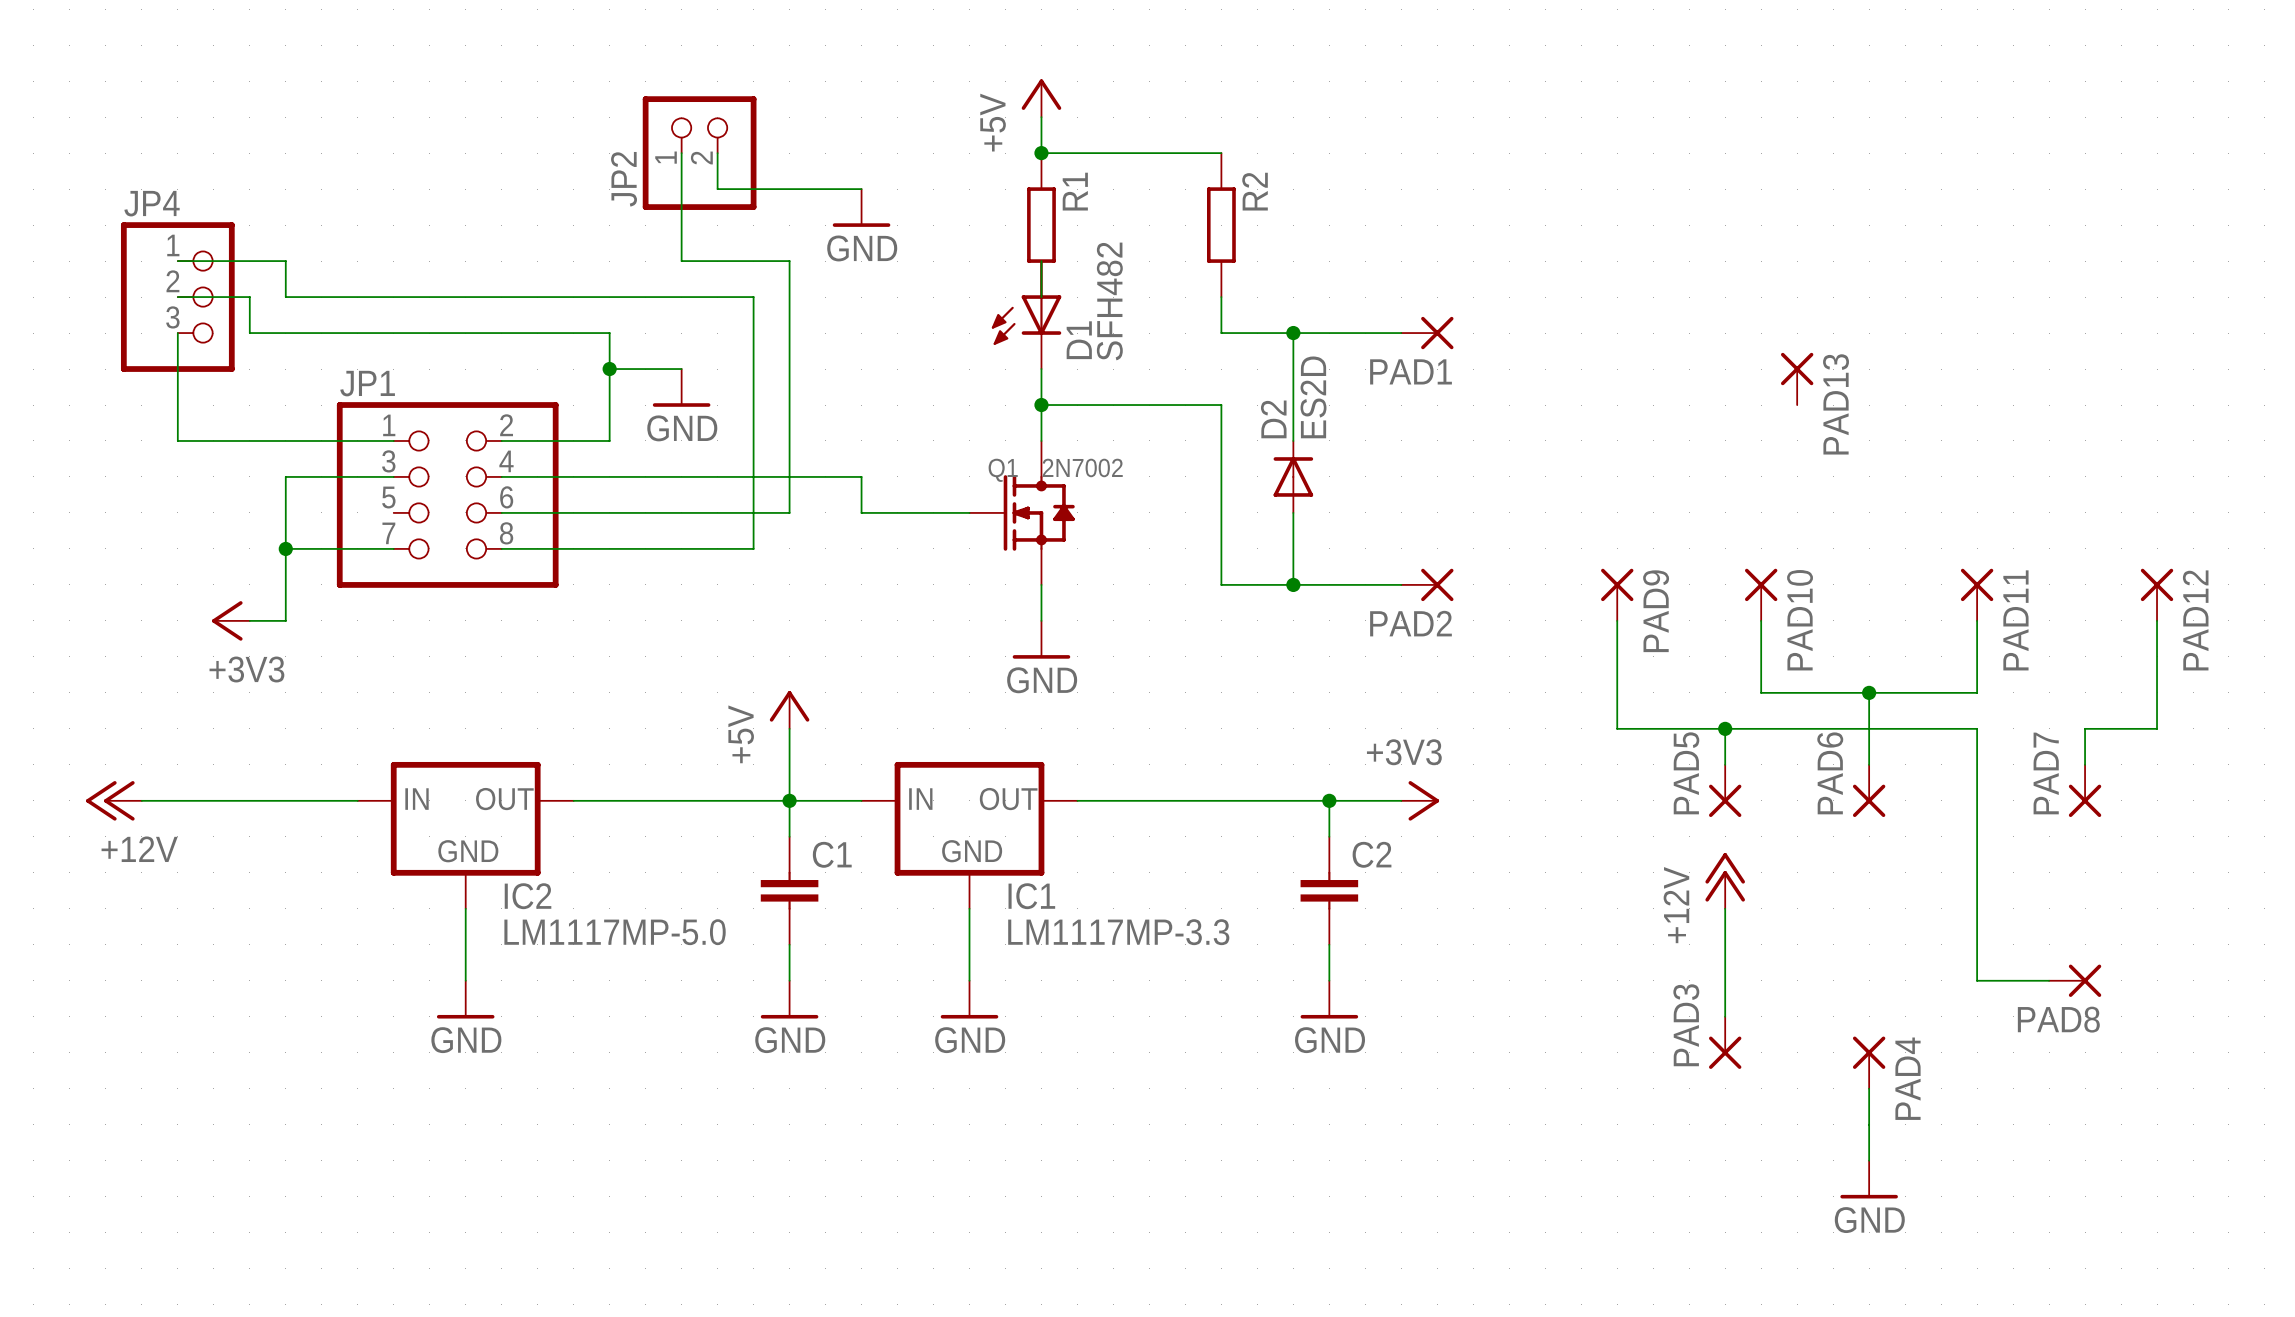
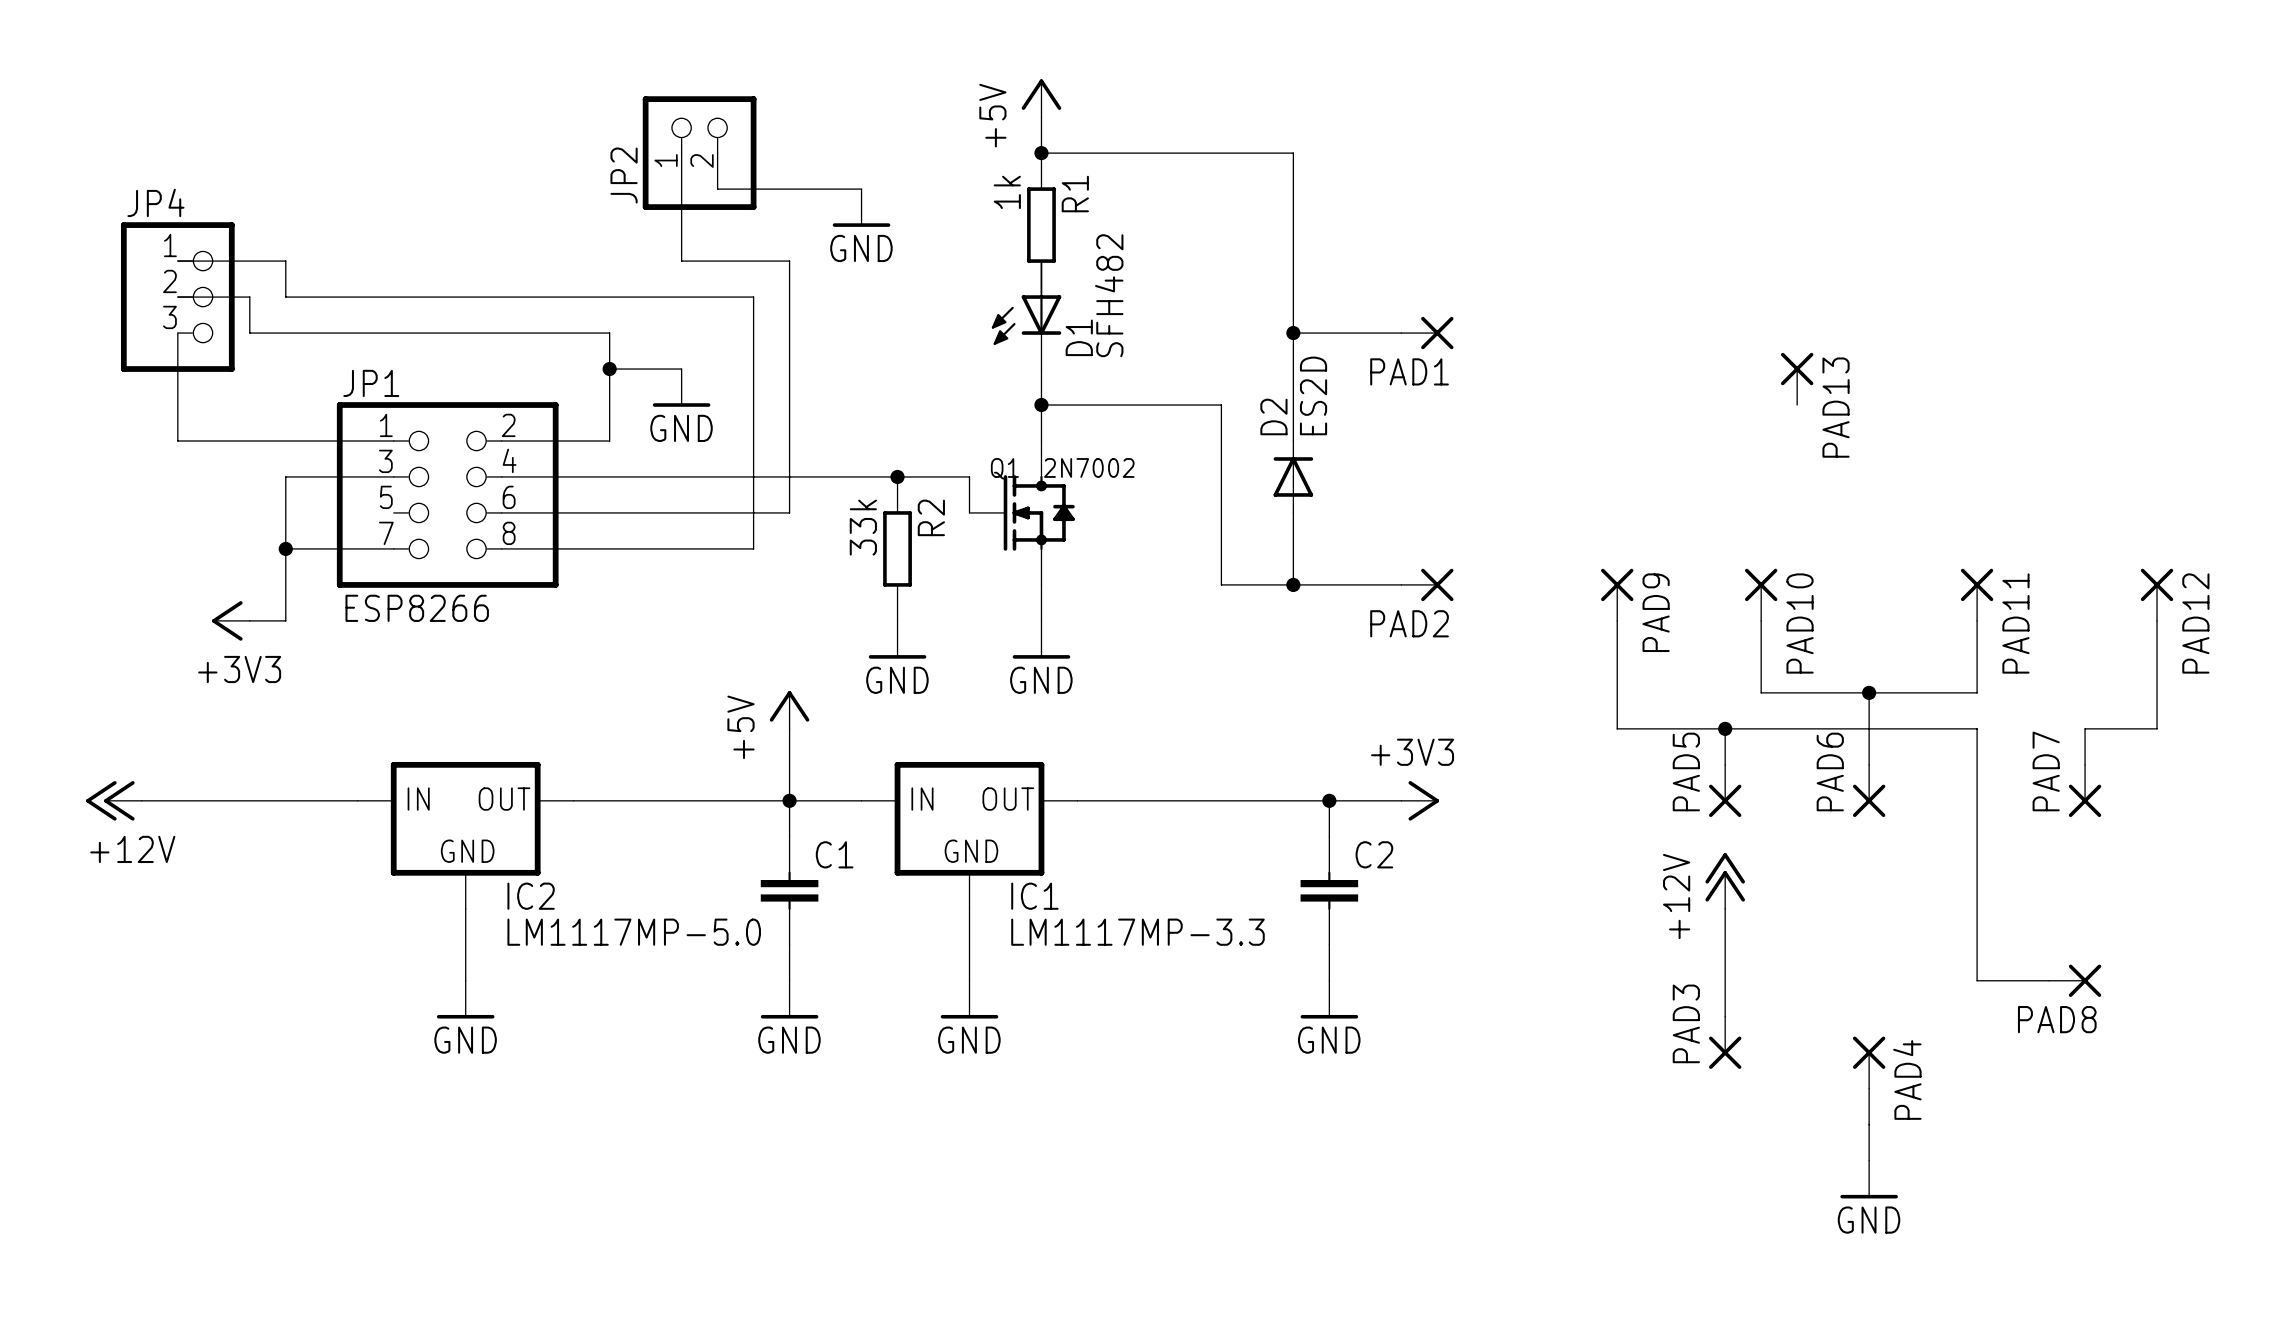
R1 value: none -> 1k (1007, 192)
R2 position: (1221, 225) -> (897, 548)
wire: (1221, 297) (1221, 333) (1293, 333) -> (1221, 153) (1293, 153) (1293, 333)
wire: (861, 476) (861, 512) (969, 512) -> (861, 476) (969, 476) (969, 512)
junction: none -> (897, 476)
R2 value: none -> 33k (863, 527)
JP1 value: none -> ESP8266 (417, 608)
power symbol: none -> GND (897, 639)

